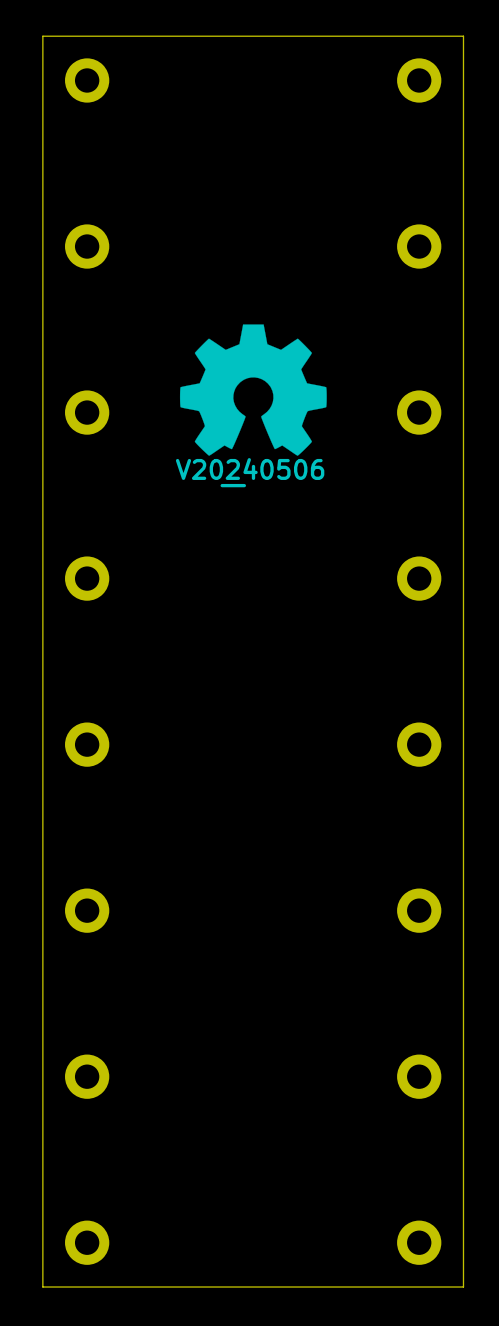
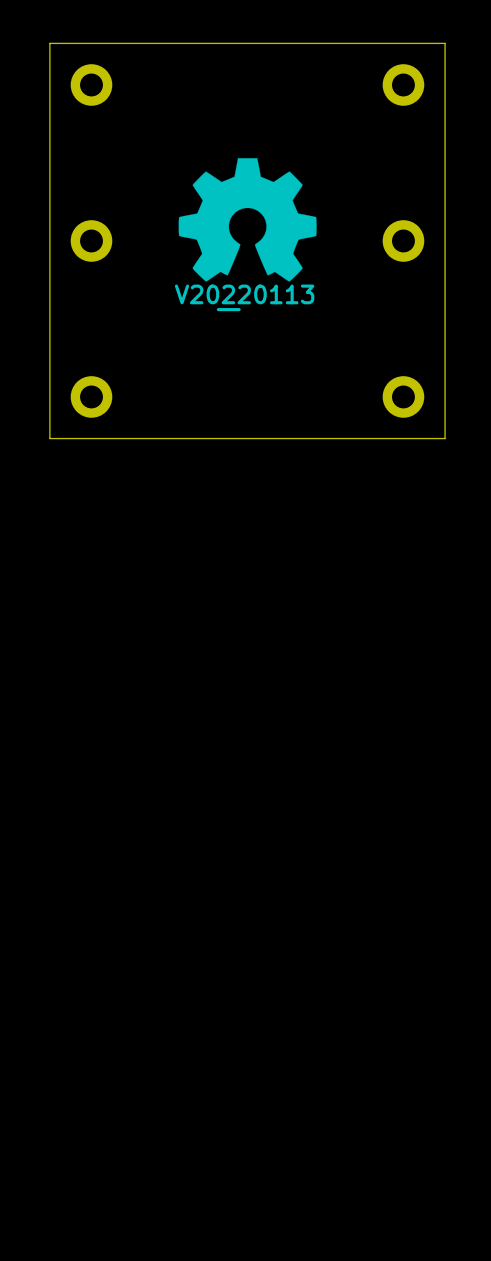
drawing: none -> [216, 308, 241, 312]
drawing position: (253, 390) -> (247, 219)
board edge: (463, 456) (463, 1287) (42, 1287) (42, 456) -> (445, 438) (49, 438)
drawing: [220, 483, 246, 488] -> none
part: (87, 578) -> none
part: (419, 578) -> none
part: (87, 744) -> none
part: (419, 744) -> none
part: (87, 910) -> none
part: (419, 910) -> none
part: (87, 1076) -> none
part: (419, 1076) -> none
part: (87, 1242) -> none
part: (419, 1242) -> none

